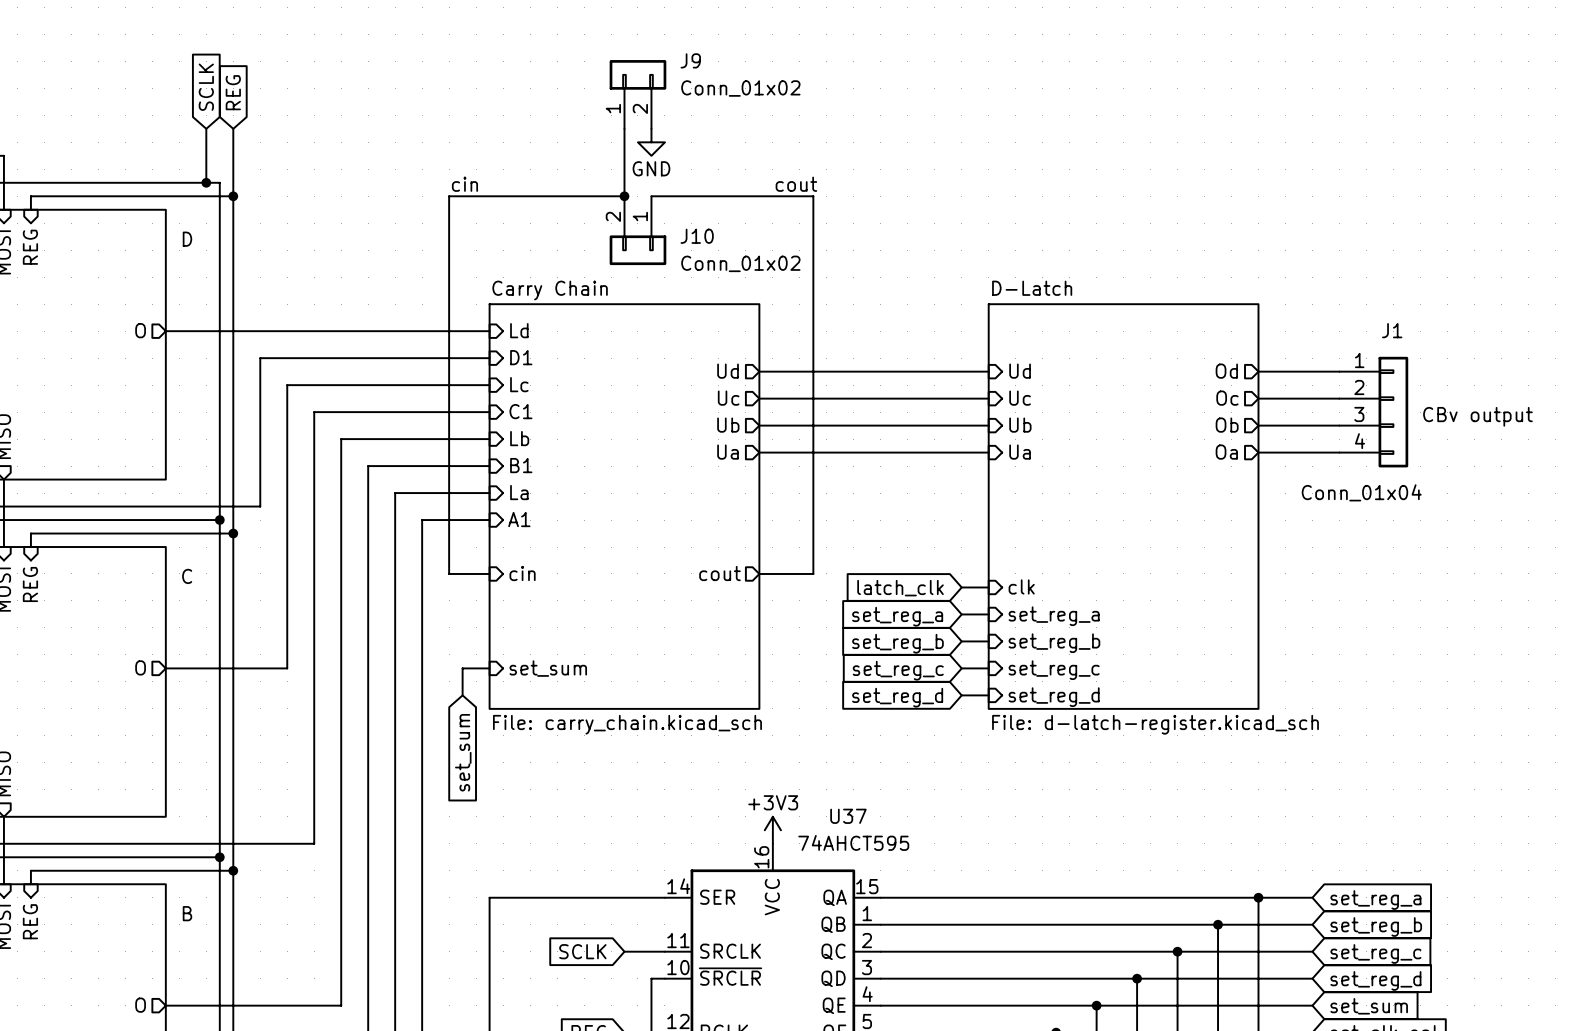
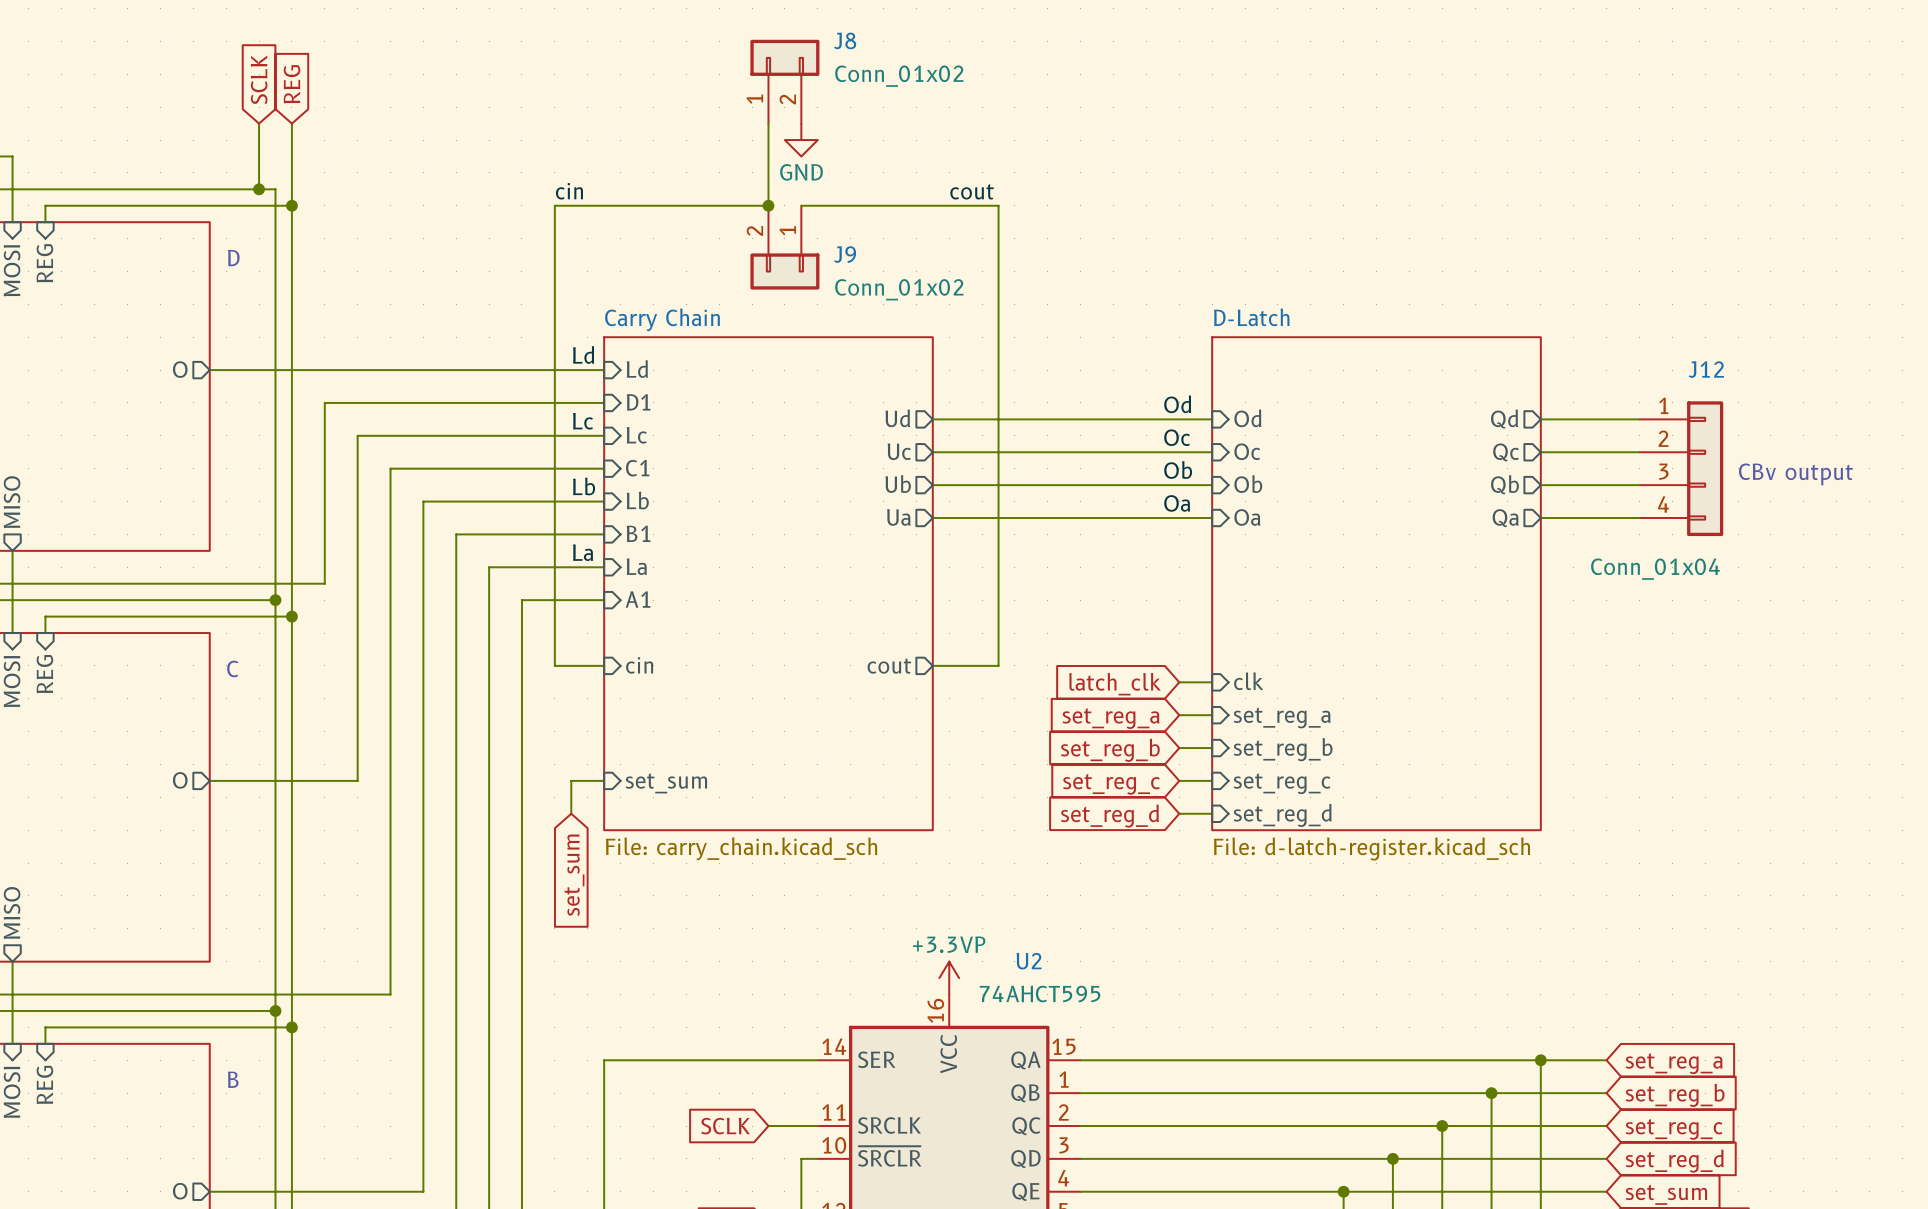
J9 name: J9 (690, 60) -> J8 (845, 40)
J10 name: J10 (697, 236) -> J9 (845, 254)
label: none -> Ld (583, 354)
J1 name: J1 (1392, 330) -> J12 (1706, 369)
label: none -> Od (1177, 404)
sheet pin: Ud (1020, 371) -> Od (1247, 418)
sheet pin: Od (1226, 371) -> Qd (1504, 419)
label: none -> Lc (582, 421)
label: none -> Oc (1177, 437)
sheet pin: Uc (1020, 398) -> Oc (1247, 451)
sheet pin: Oc (1227, 398) -> Qc (1506, 452)
label: none -> Ob (1178, 470)
sheet pin: Ub (1020, 425) -> Ob (1248, 484)
sheet pin: Ob (1227, 425) -> Qb (1504, 484)
label: none -> Lb (584, 486)
label: none -> Oa (1177, 503)
sheet pin: Ua (1020, 452) -> Oa (1247, 517)
sheet pin: Oa (1226, 452) -> Qa (1505, 518)
label: none -> La (583, 552)
U37 name: U37 (848, 816) -> U2 (1029, 961)
power symbol: +3V3 (772, 830) -> +3.3VP (949, 978)

